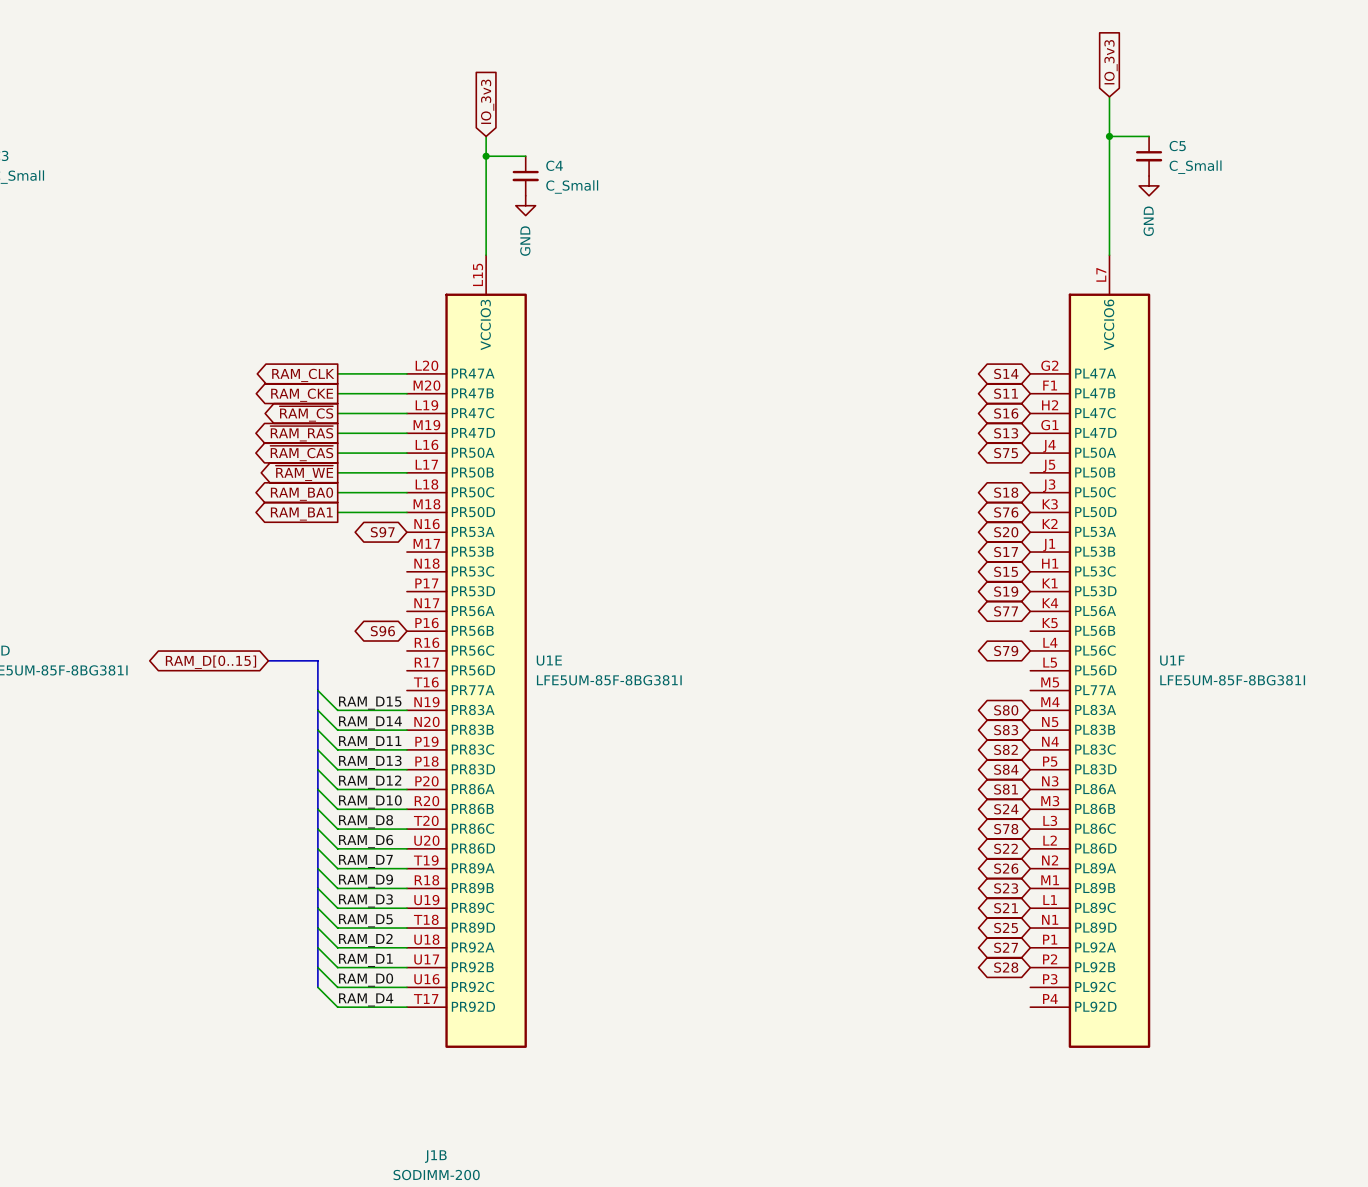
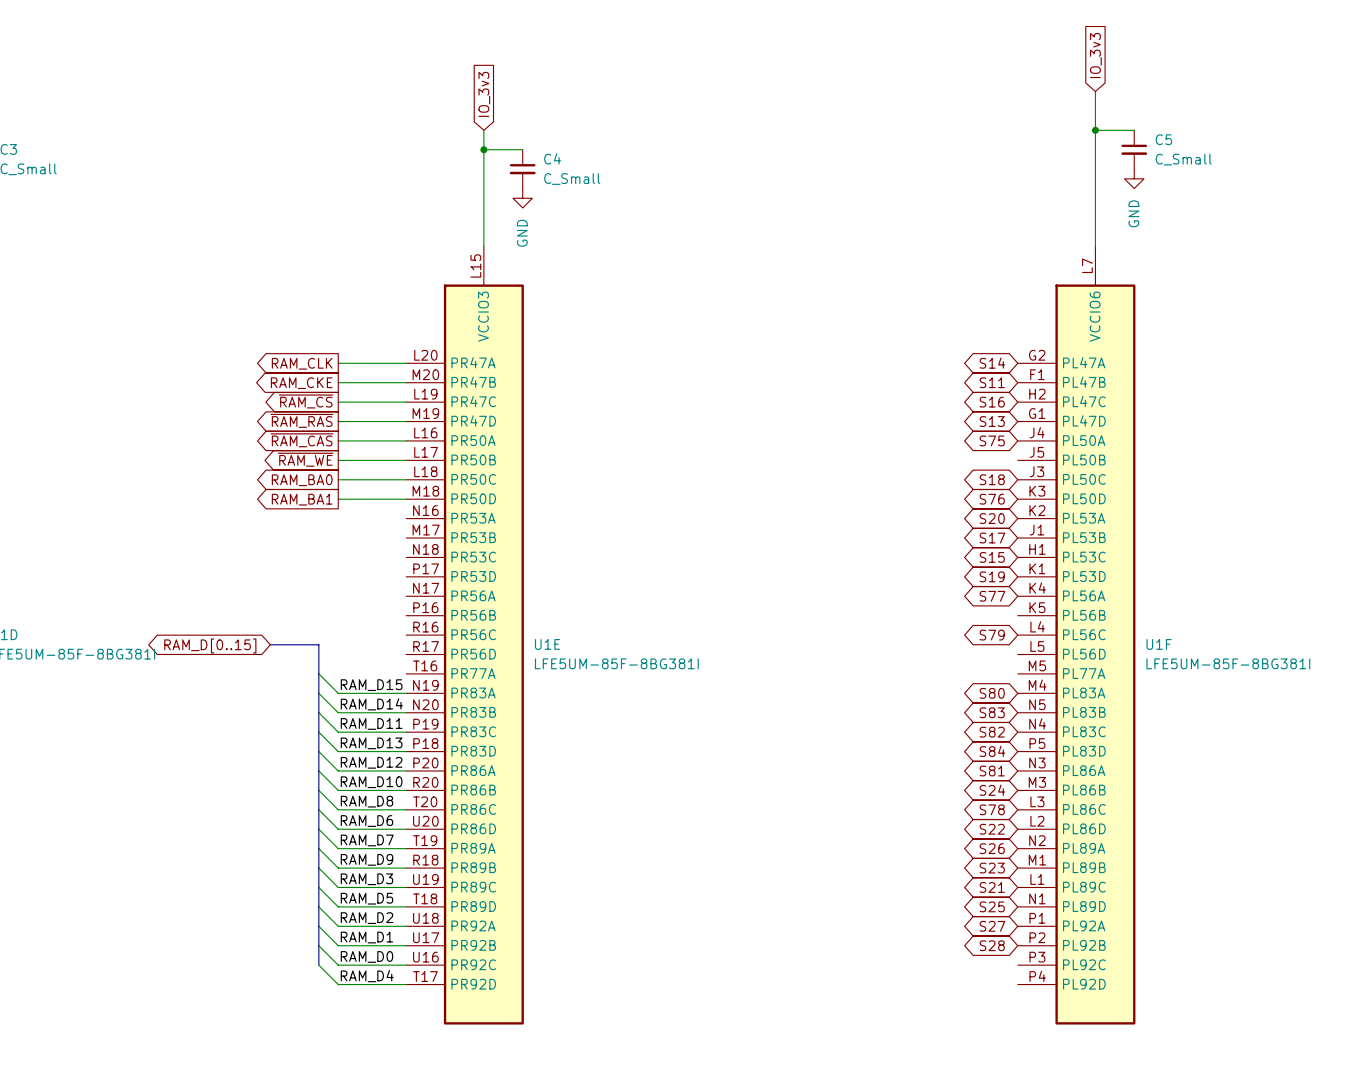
global label: S97 (382, 532) -> none
global label: S96 (382, 631) -> none

